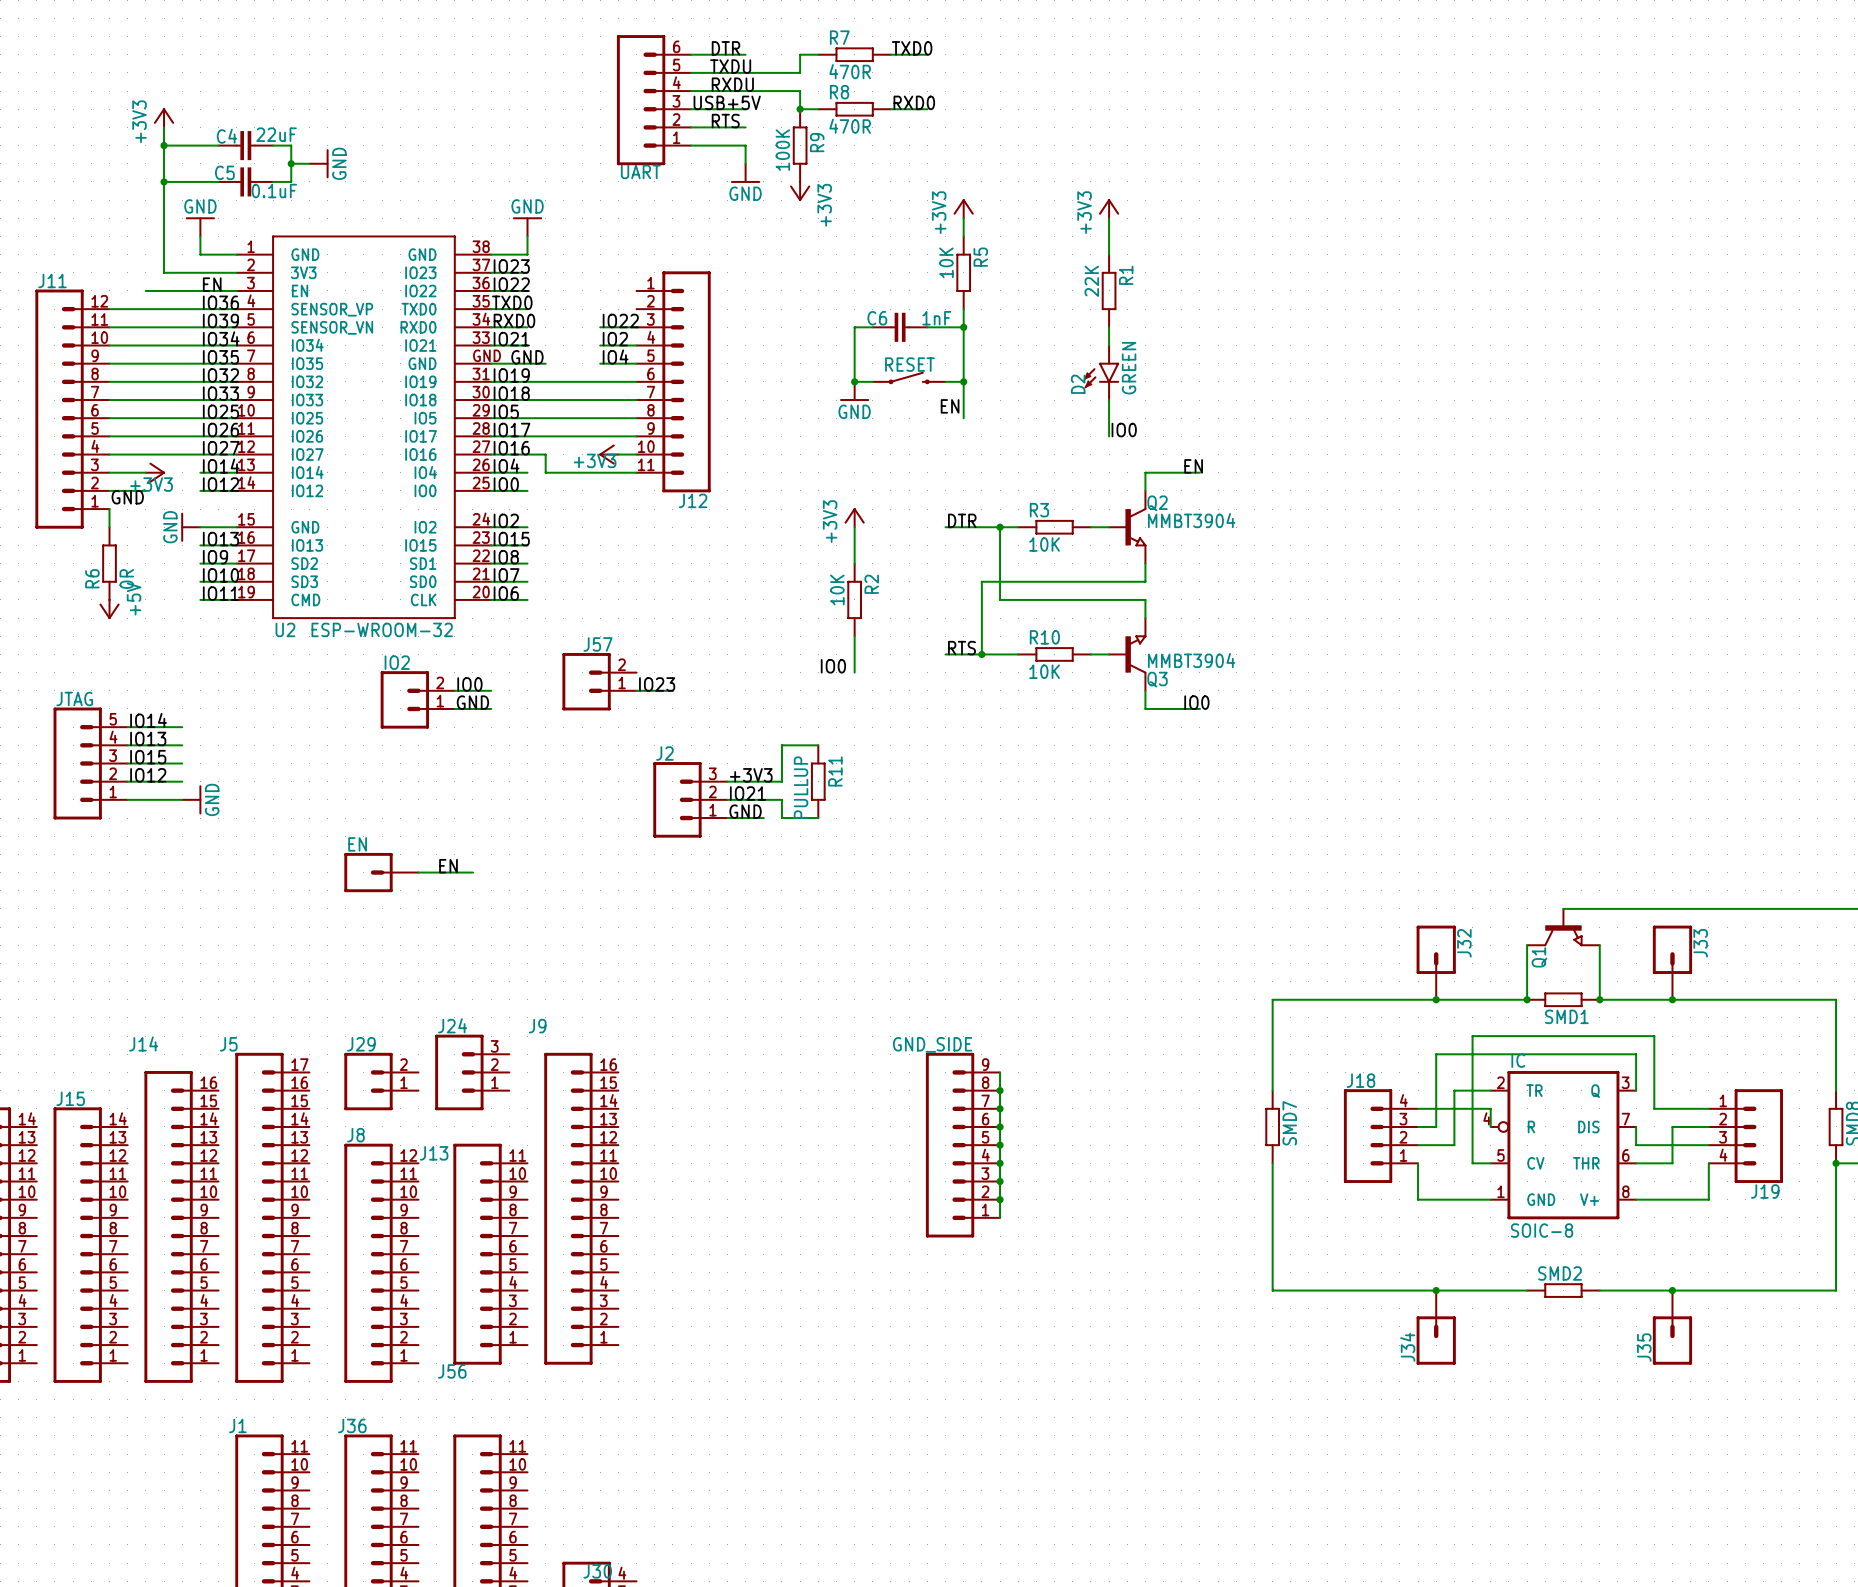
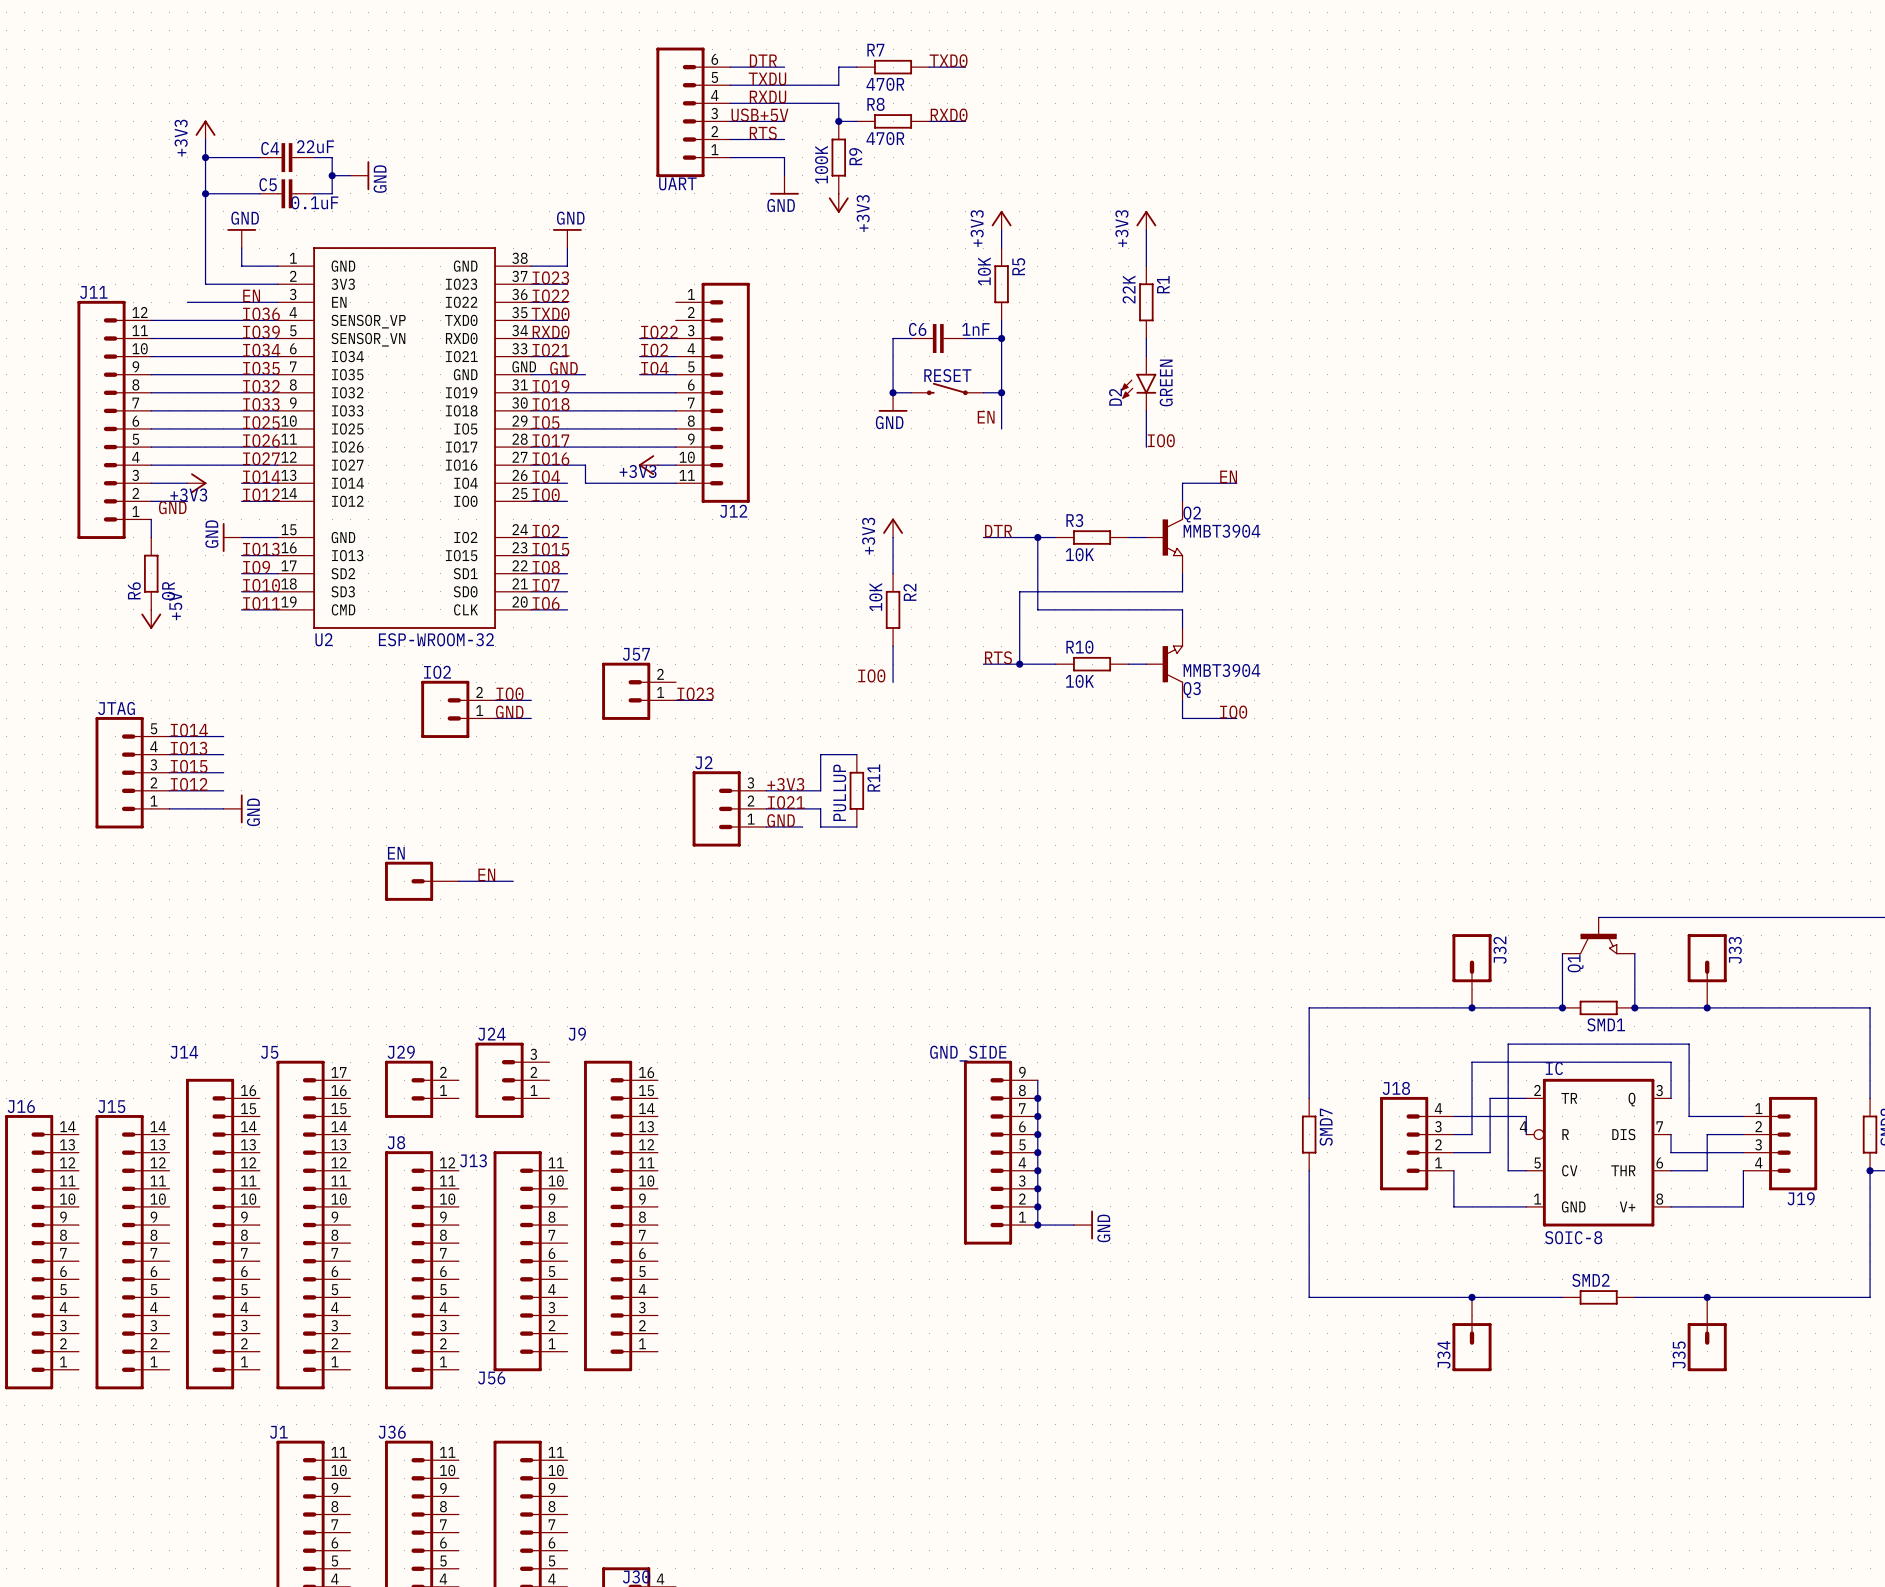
RESET flip: as is (909, 378) -> left-right (947, 388)
wire: none -> (1037, 1225) (1073, 1225)
junction: none -> (1037, 1225)
power symbol: none -> GND (1083, 1225)

